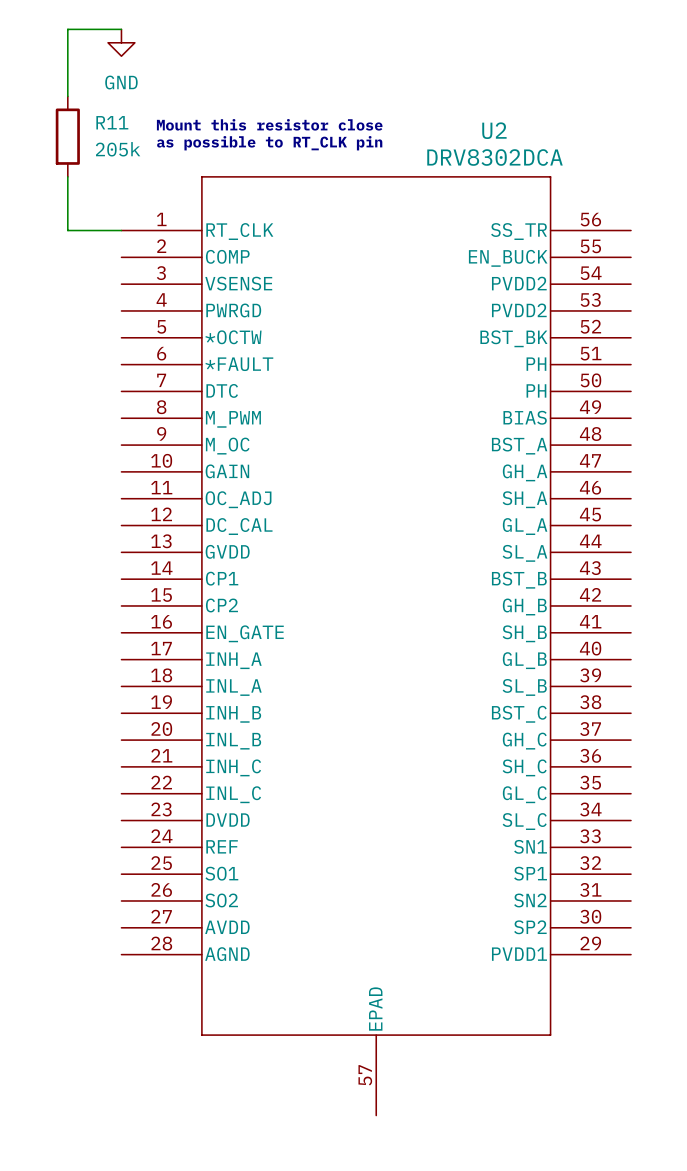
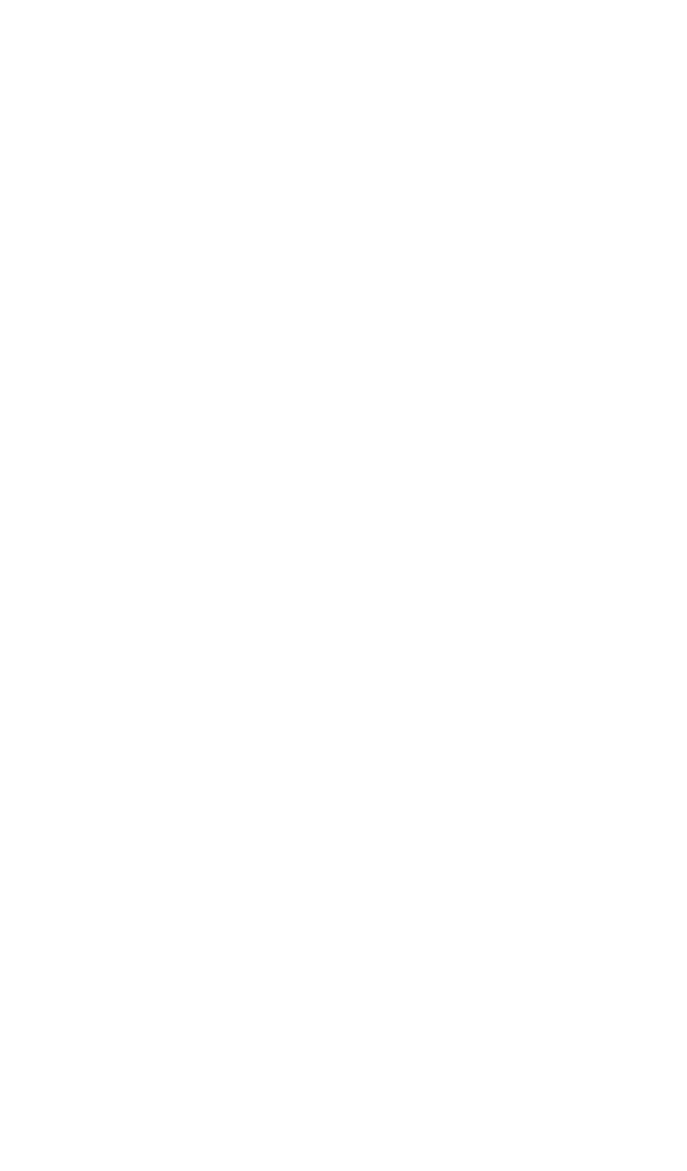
wire: (121, 29) (67, 29) (67, 96) -> none
power symbol: GND (121, 42) -> none
text: Mount this resistor close (269, 124) -> none
R11: 205k (67, 136) -> none
text: as possible to RT_CLK pin (269, 143) -> none
wire: (67, 176) (67, 230) (121, 230) -> none
U2: DRV8302DCA (376, 645) -> none

